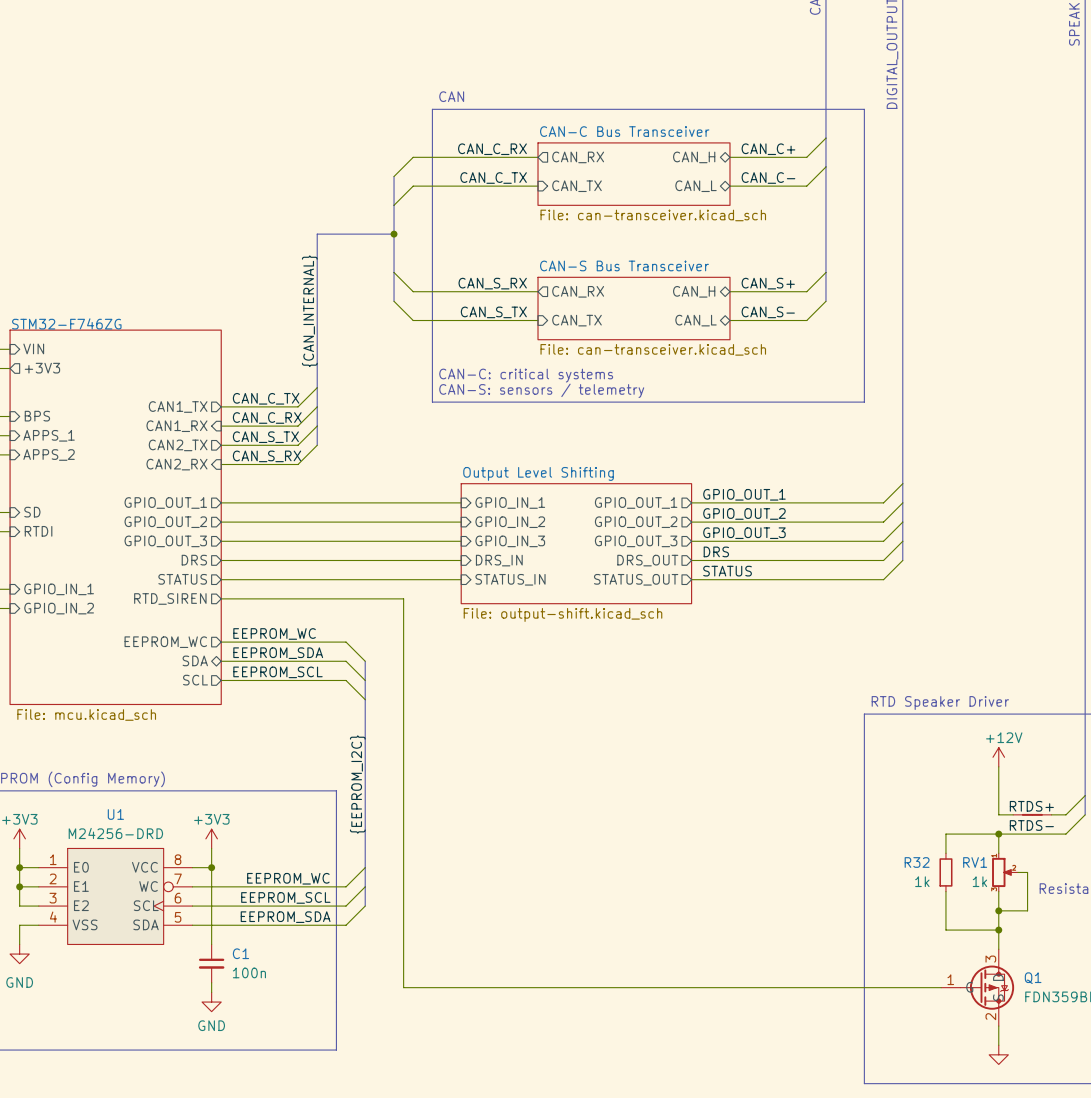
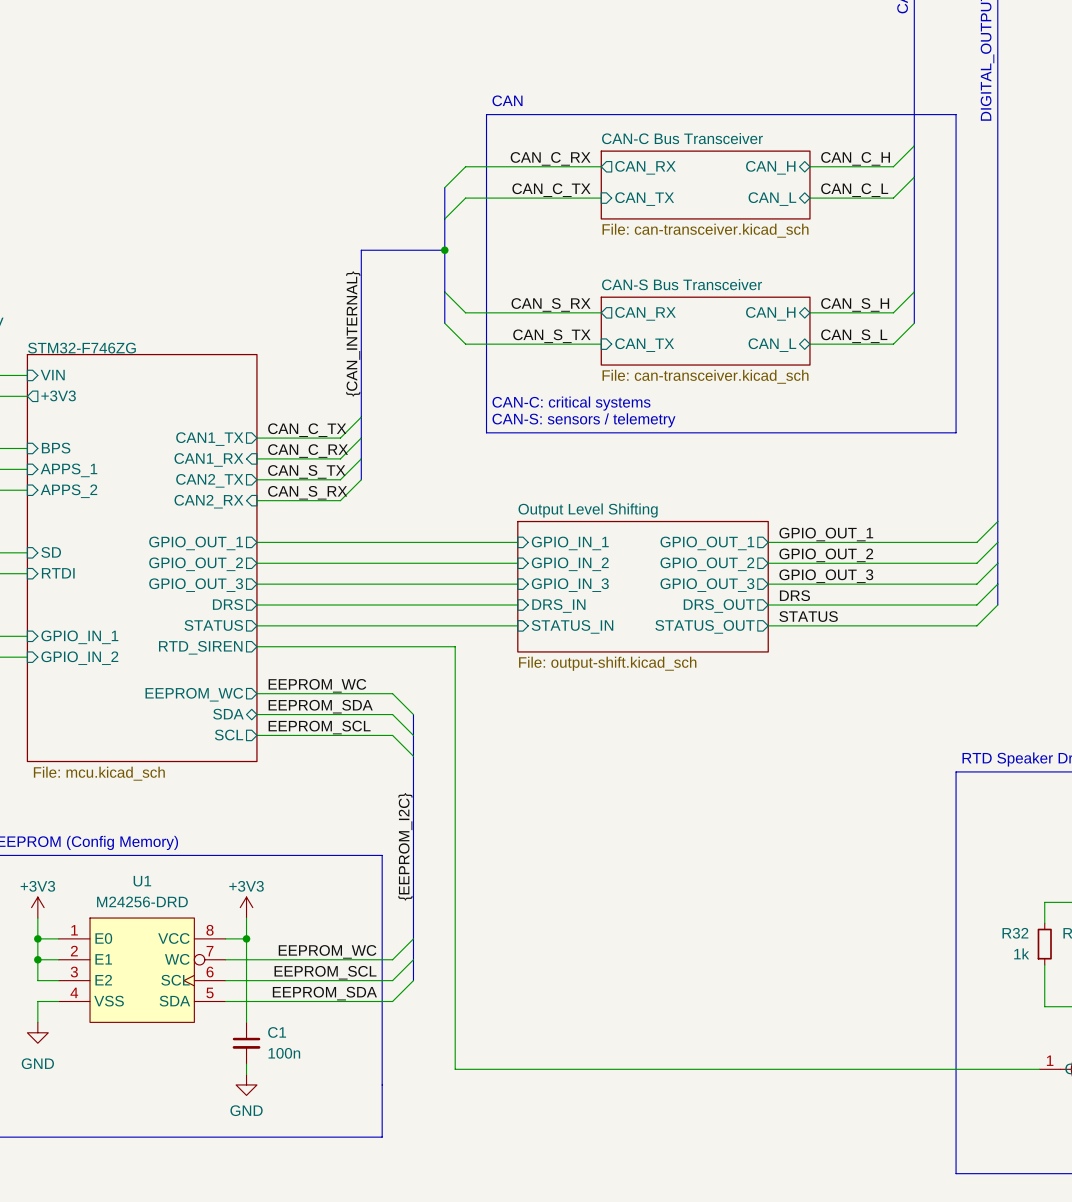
label: CAN_C+ (768, 149) -> CAN_C_H (855, 158)
label: CAN_C- (768, 178) -> CAN_C_L (854, 190)
label: CAN_S+ (768, 283) -> CAN_S_H (855, 304)
label: CAN_S- (768, 312) -> CAN_S_L (854, 336)

